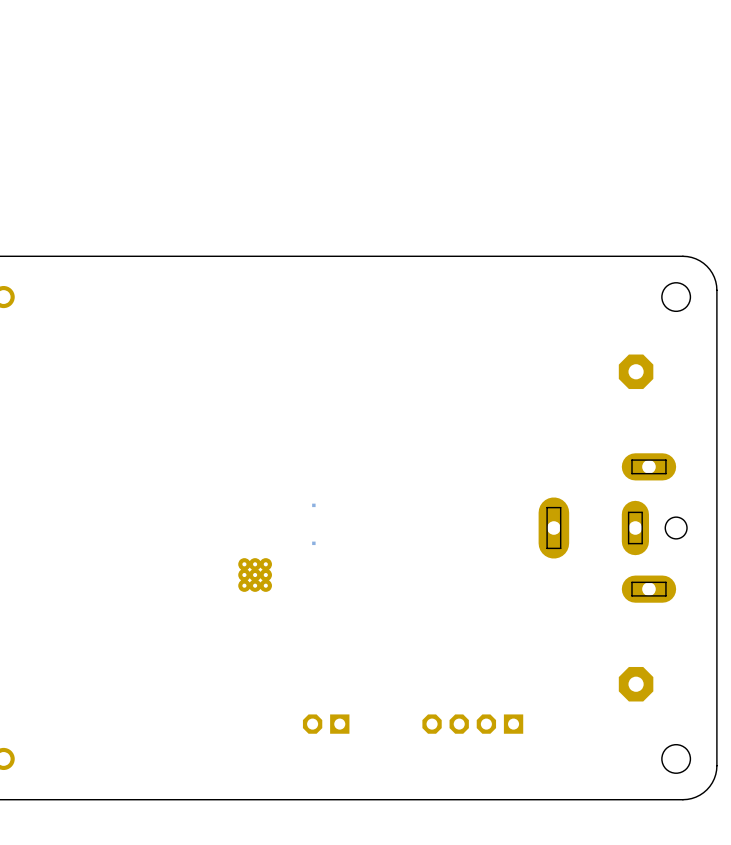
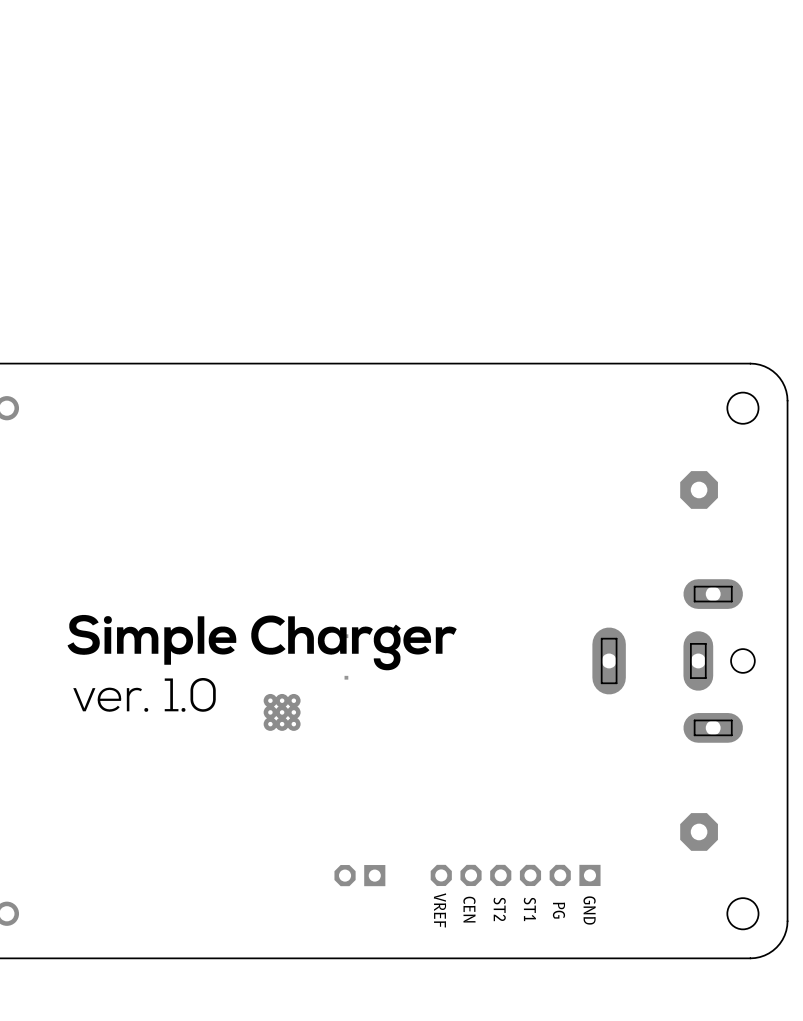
drawing: none -> [67, 614, 457, 712]
part footprint: [422, 714, 524, 734] -> [430, 864, 601, 887]
text: none -> ST1 (529, 909)
text: none -> VREF (440, 910)
text: none -> CEN (469, 909)
text: none -> ST2 (499, 909)
text: none -> GND (589, 910)
text: none -> PG (558, 910)

